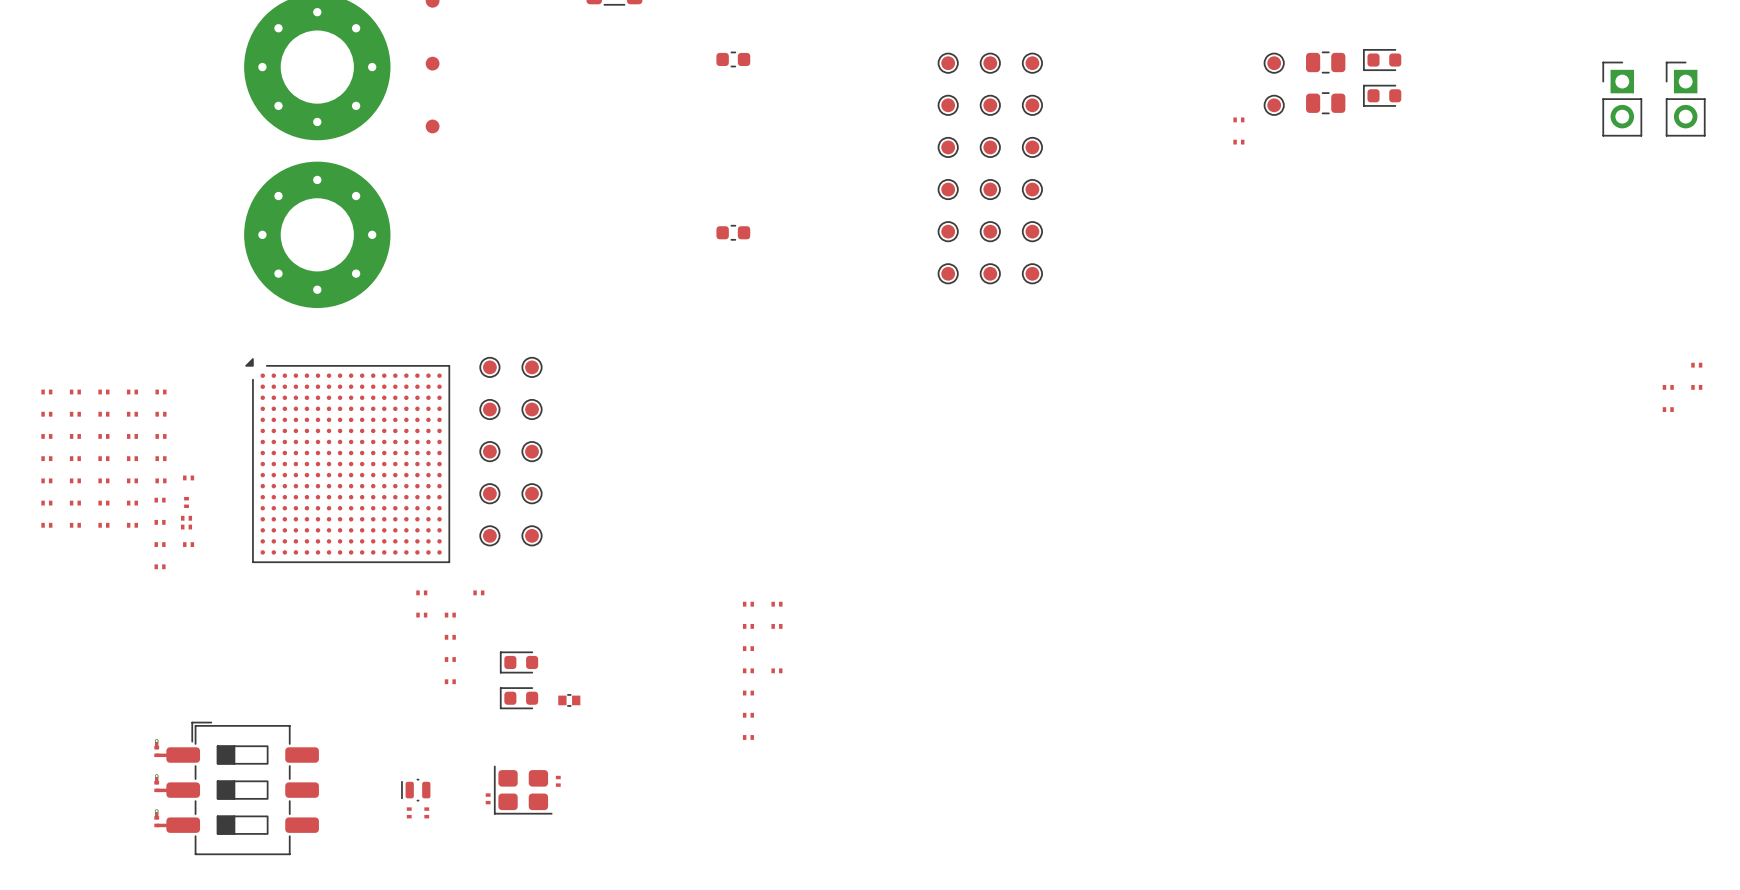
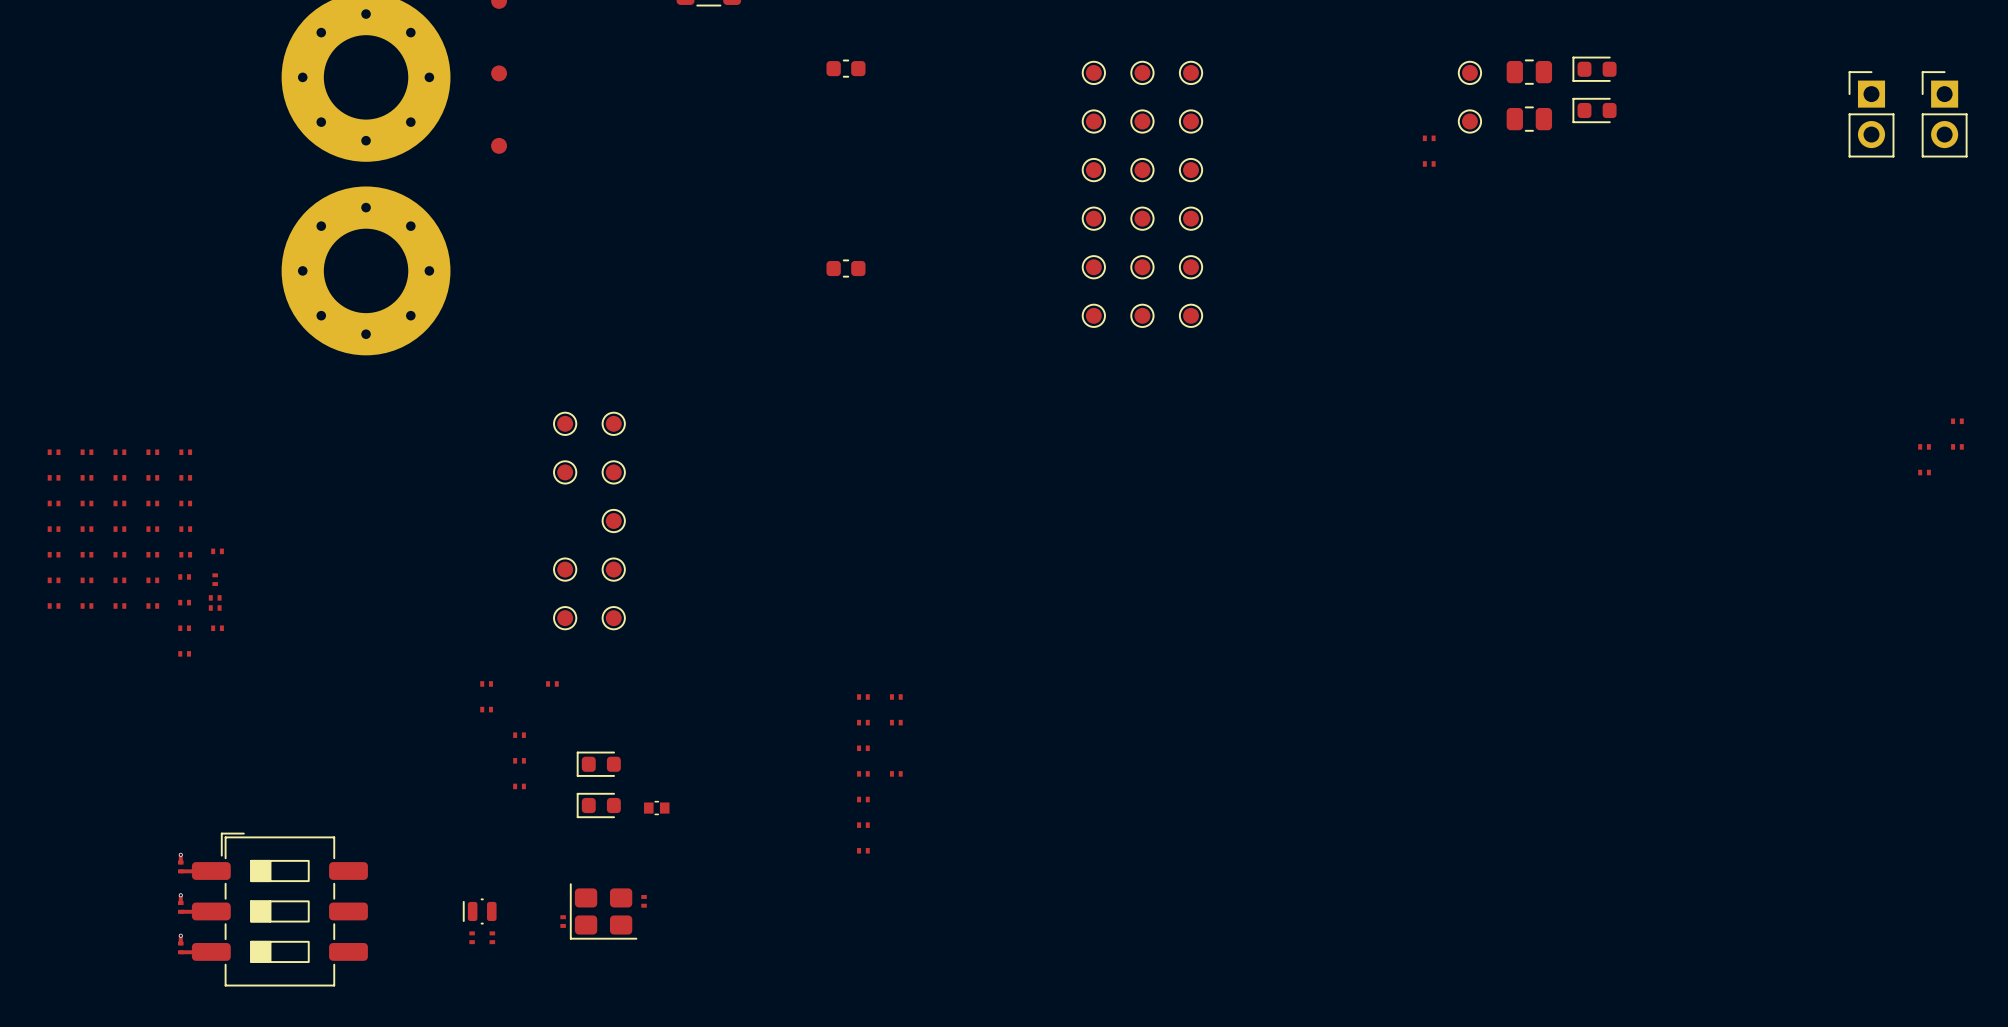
part: (489, 451) -> none
part: (347, 460) -> none
part: (450, 615) -> none

